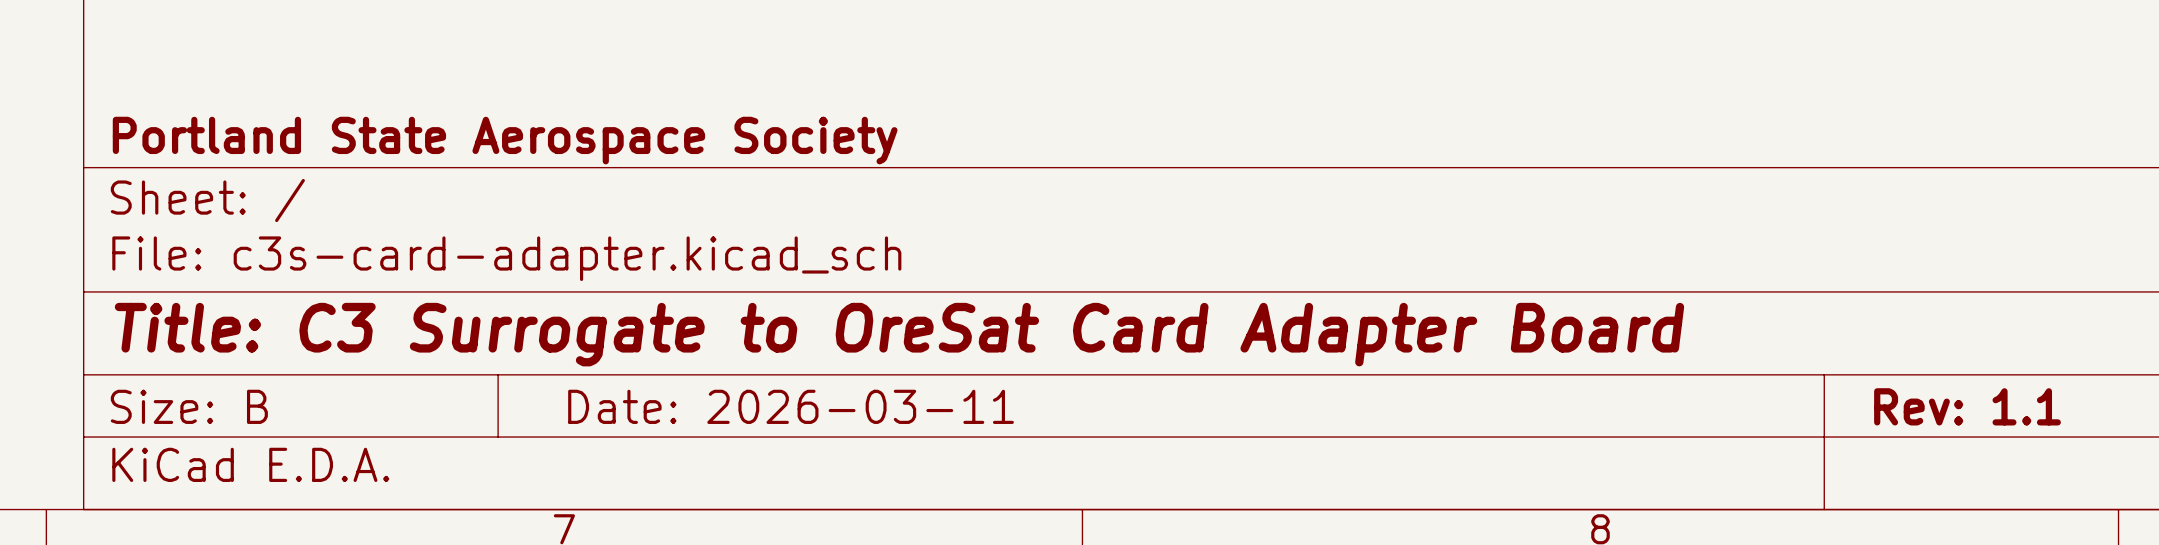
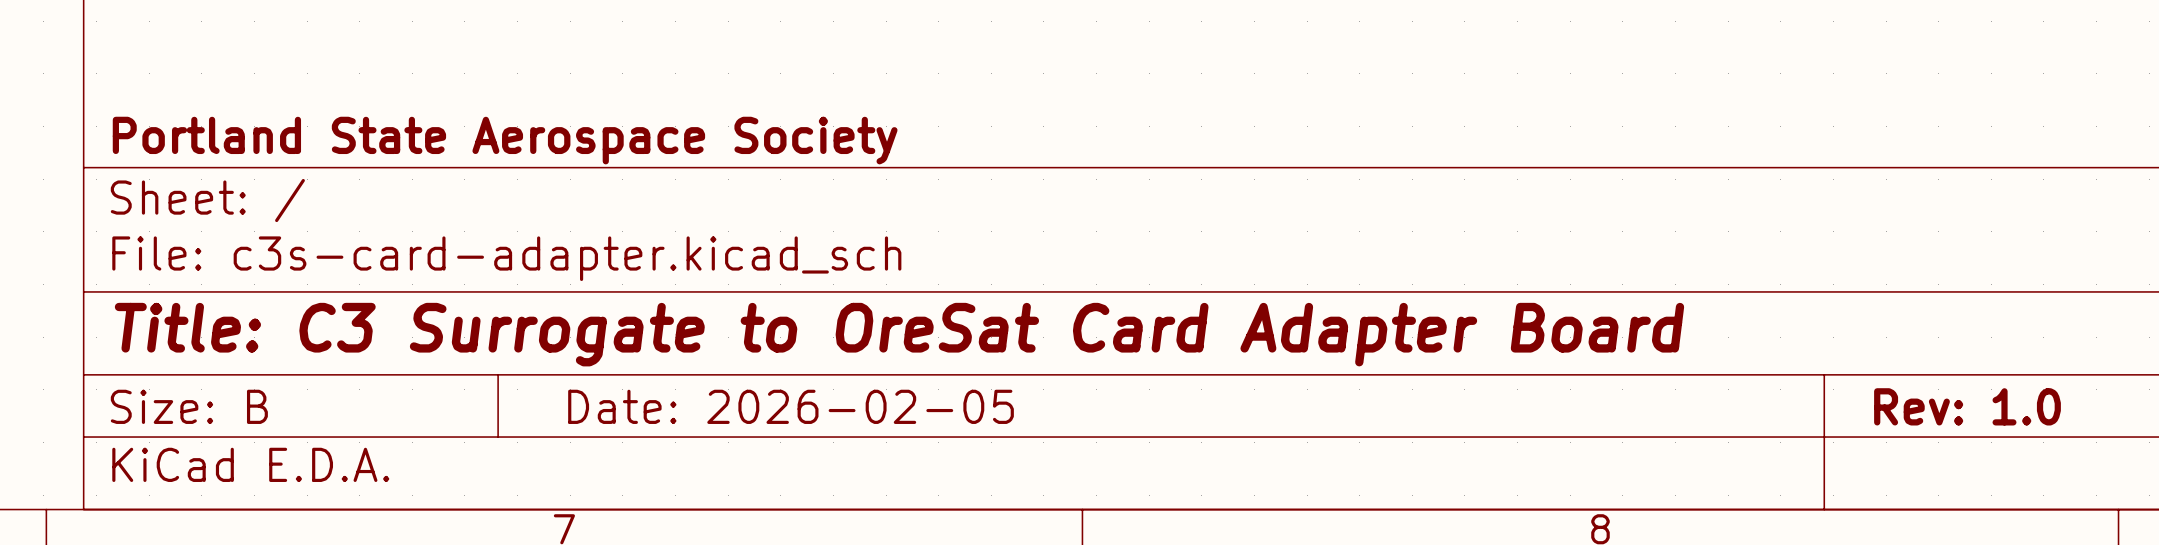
title block: Date: 2026-03-11 (791, 406) -> Date: 2026-02-05 (791, 406)
title block: Rev: 1.1 (1967, 406) -> Rev: 1.0 (1967, 406)

